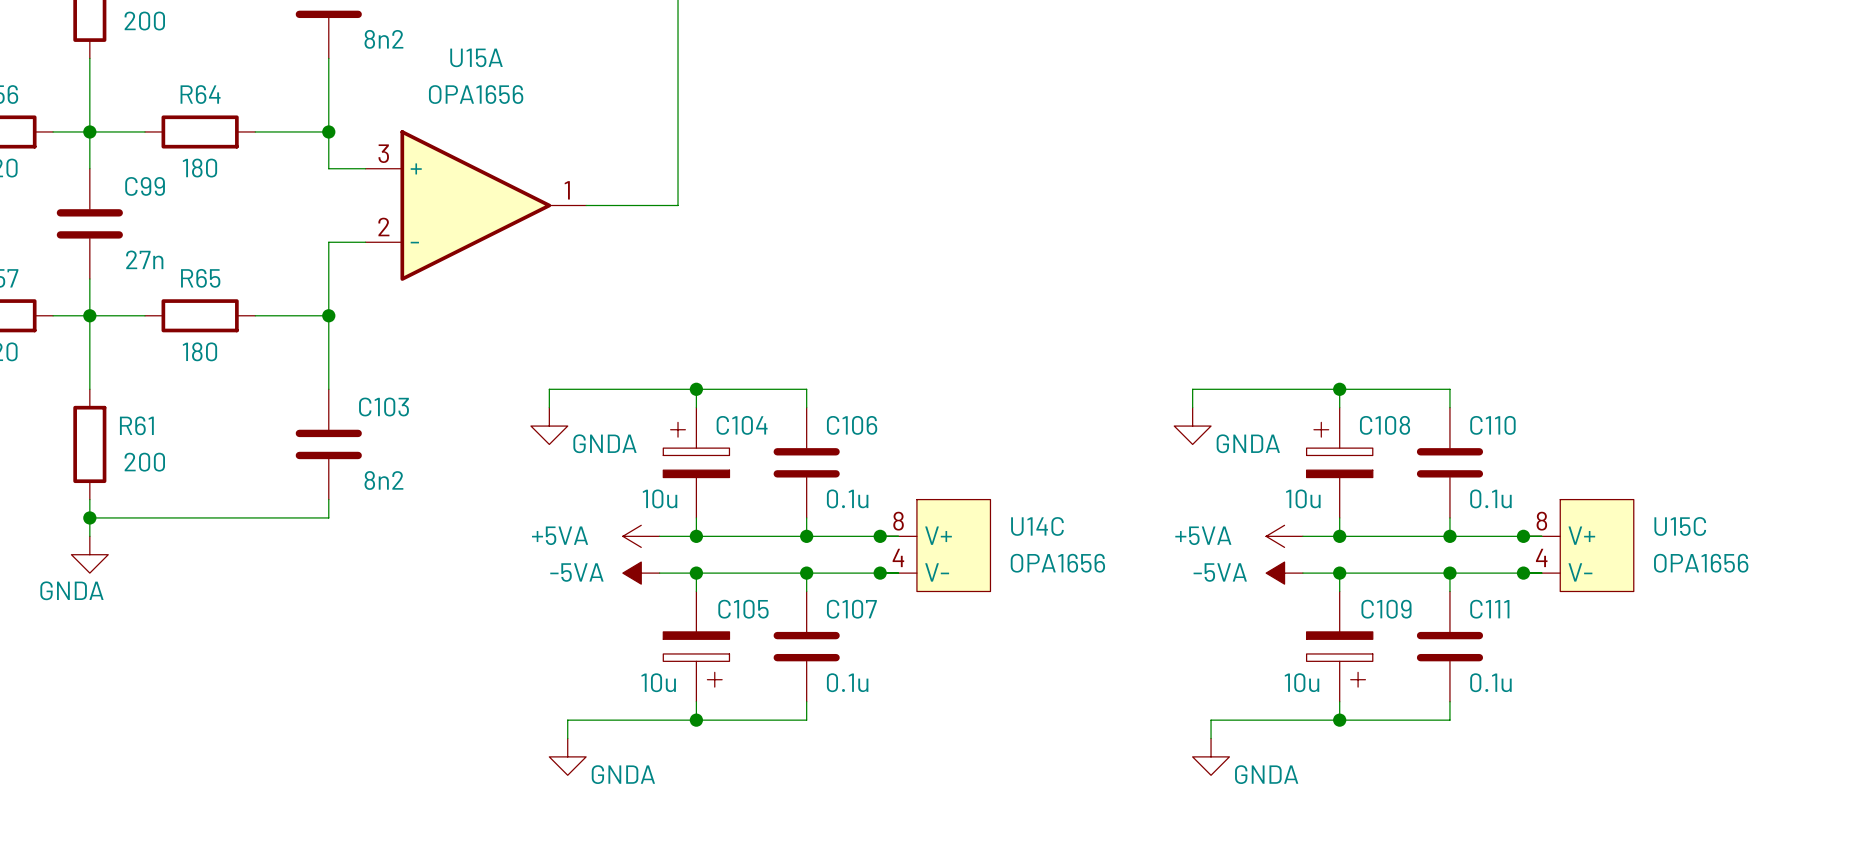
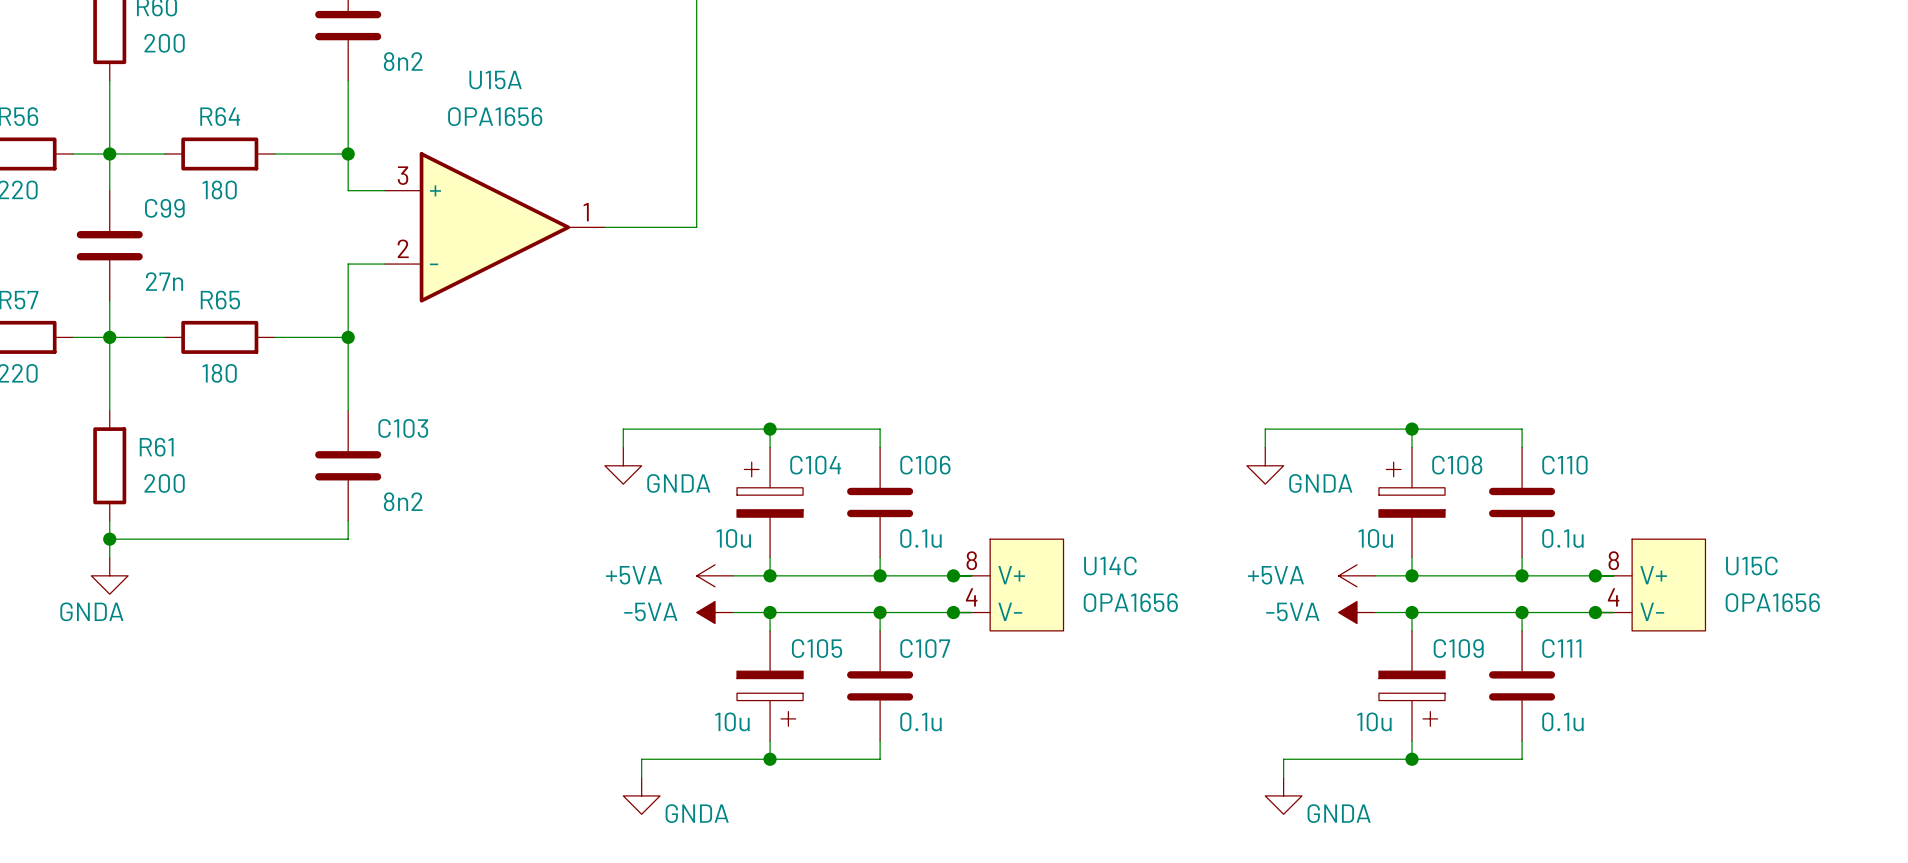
wire: (696, 389) (696, 407) -> (770, 429) (770, 447)
junction position: (696, 389) -> (770, 429)
wire: (1339, 389) (1339, 407) -> (1412, 429) (1412, 447)
junction position: (1339, 389) -> (1412, 429)
wire: (549, 407) (549, 389) (806, 389) (806, 407) -> (623, 447) (623, 429) (880, 429) (880, 447)
wire: (1192, 407) (1192, 389) (1449, 389) (1449, 407) -> (1265, 447) (1265, 429) (1522, 429) (1522, 447)
power symbol position: GNDA (549, 426) -> GNDA (623, 465)
power symbol position: GNDA (1192, 426) -> GNDA (1265, 465)
C104 position: (696, 462) -> (770, 502)
C106 position: (806, 462) -> (880, 502)
C108 position: (1339, 462) -> (1412, 502)
C110 position: (1449, 462) -> (1522, 502)
wire: (696, 517) (696, 536) -> (770, 557) (770, 575)
wire: (806, 517) (806, 536) -> (880, 557) (880, 575)
wire: (1339, 517) (1339, 536) -> (1412, 557) (1412, 575)
wire: (1449, 517) (1449, 536) -> (1522, 557) (1522, 575)
power symbol position: +5VA (641, 536) -> +5VA (715, 575)
wire: (659, 536) (898, 536) -> (733, 575) (971, 575)
junction: (696, 536) -> none
junction: (806, 536) -> none
junction: (880, 536) -> none
power symbol position: +5VA (1284, 536) -> +5VA (1356, 575)
wire: (1302, 536) (1541, 536) -> (1375, 575) (1613, 575)
junction: (1339, 536) -> none
junction: (1449, 536) -> none
junction: (1523, 536) -> none
U14C position: (935, 545) -> (1008, 585)
U15C position: (1578, 545) -> (1650, 585)
junction: none -> (770, 575)
junction: none -> (880, 575)
junction: none -> (953, 575)
junction: none -> (1412, 575)
junction: none -> (1522, 575)
junction: none -> (1595, 575)
power symbol position: -5VA (641, 573) -> -5VA (715, 612)
wire: (659, 573) (898, 573) -> (733, 612) (971, 612)
junction: (696, 573) -> none
wire: (806, 573) (806, 591) -> (880, 612) (880, 630)
junction: (806, 573) -> none
junction: (880, 573) -> none
power symbol position: -5VA (1284, 573) -> -5VA (1356, 612)
wire: (1302, 573) (1541, 573) -> (1375, 612) (1613, 612)
junction: (1339, 573) -> none
wire: (1449, 573) (1449, 591) -> (1522, 612) (1522, 630)
junction: (1449, 573) -> none
junction: (1523, 573) -> none
junction: none -> (770, 612)
junction: none -> (880, 612)
junction: none -> (953, 612)
junction: none -> (1412, 612)
junction: none -> (1522, 612)
junction: none -> (1595, 612)
C105 position: (696, 646) -> (770, 685)
C107 position: (806, 646) -> (880, 685)
C109 position: (1339, 646) -> (1412, 685)
C111 position: (1449, 646) -> (1522, 685)
wire: (696, 701) (696, 720) -> (770, 740) (770, 759)
wire: (806, 701) (806, 720) (567, 720) (567, 738) -> (880, 740) (880, 759) (641, 759) (641, 777)
wire: (1339, 701) (1339, 720) -> (1412, 740) (1412, 759)
wire: (1449, 701) (1449, 720) (1211, 720) (1211, 738) -> (1522, 740) (1522, 759) (1283, 759) (1283, 777)
junction position: (696, 720) -> (770, 759)
junction position: (1339, 720) -> (1412, 759)
power symbol position: GNDA (567, 756) -> GNDA (641, 795)
power symbol position: GNDA (1211, 756) -> GNDA (1283, 795)

